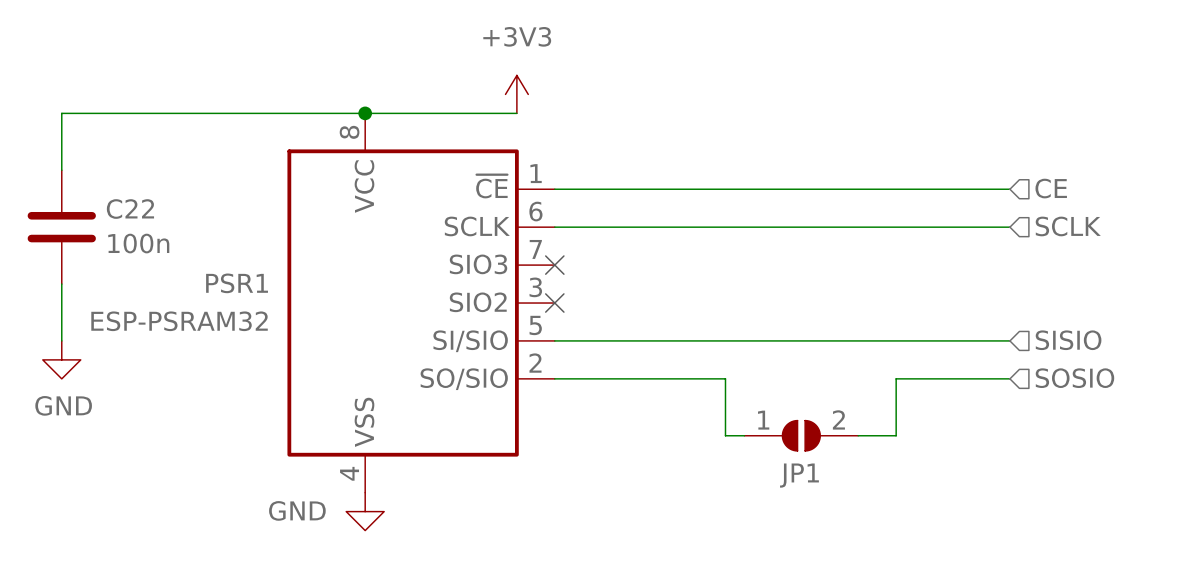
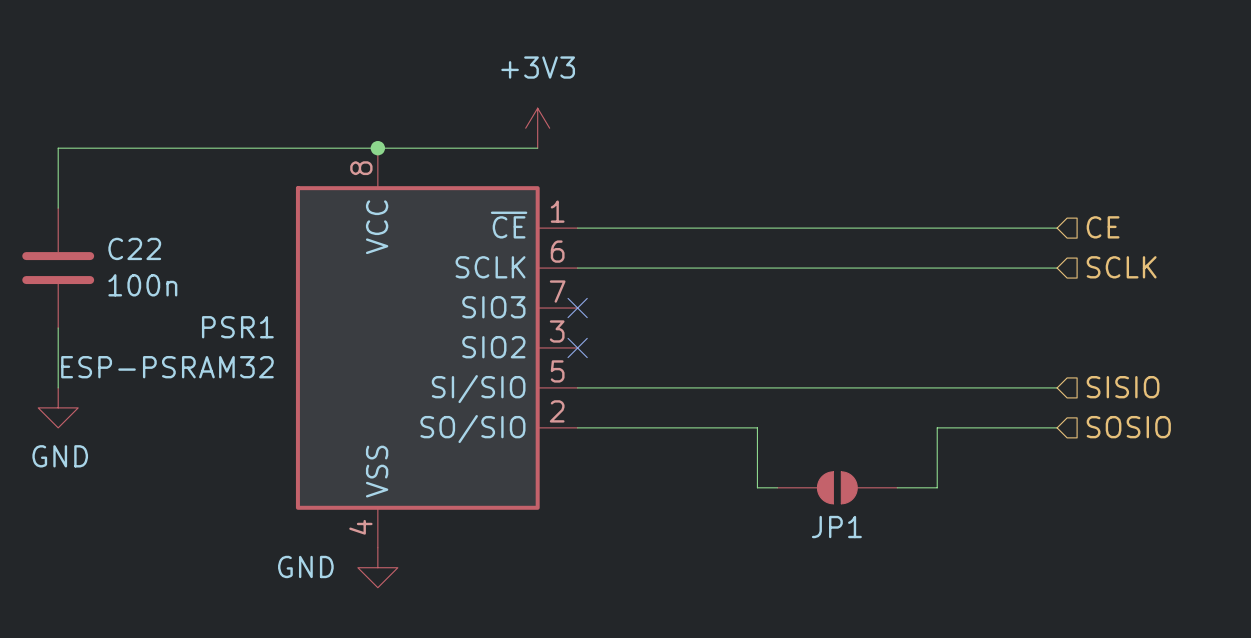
JP1 pin number: 2 (838, 419) -> none
JP1 pin number: 1 (763, 420) -> none

